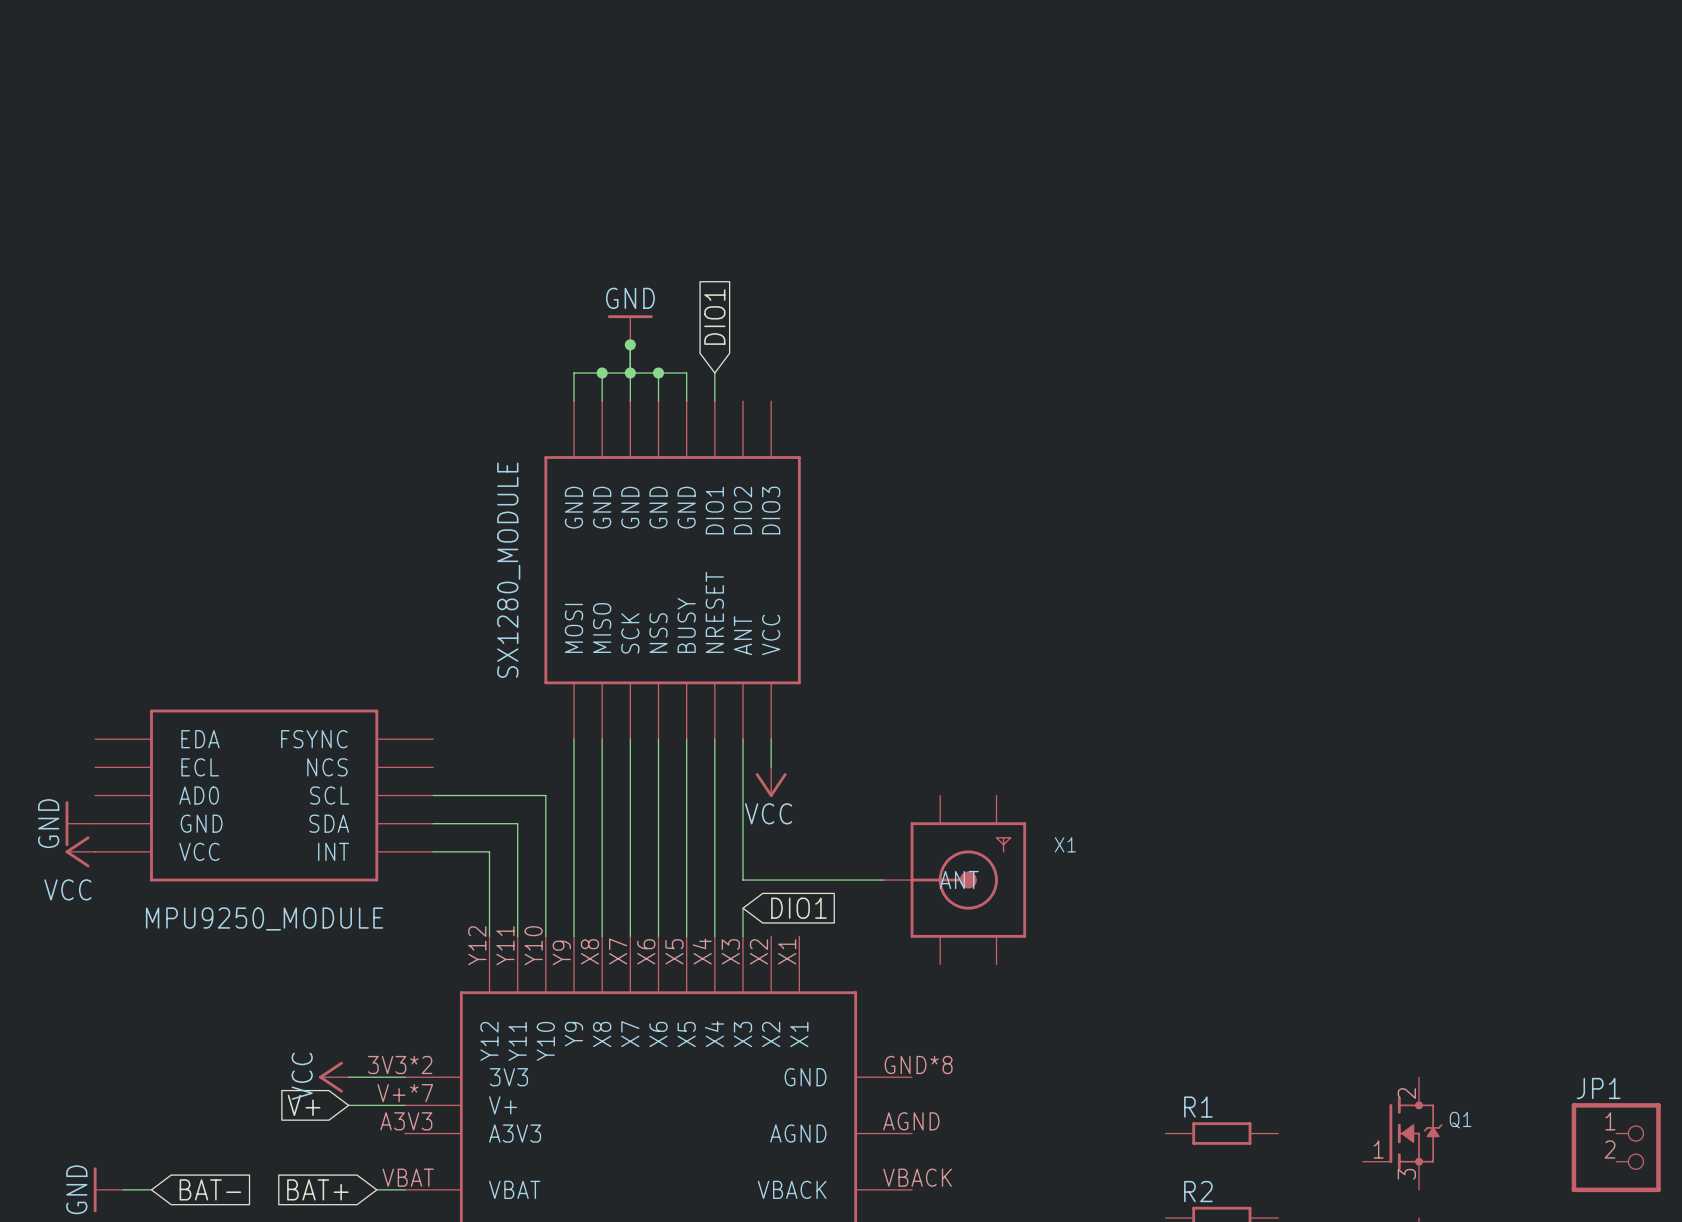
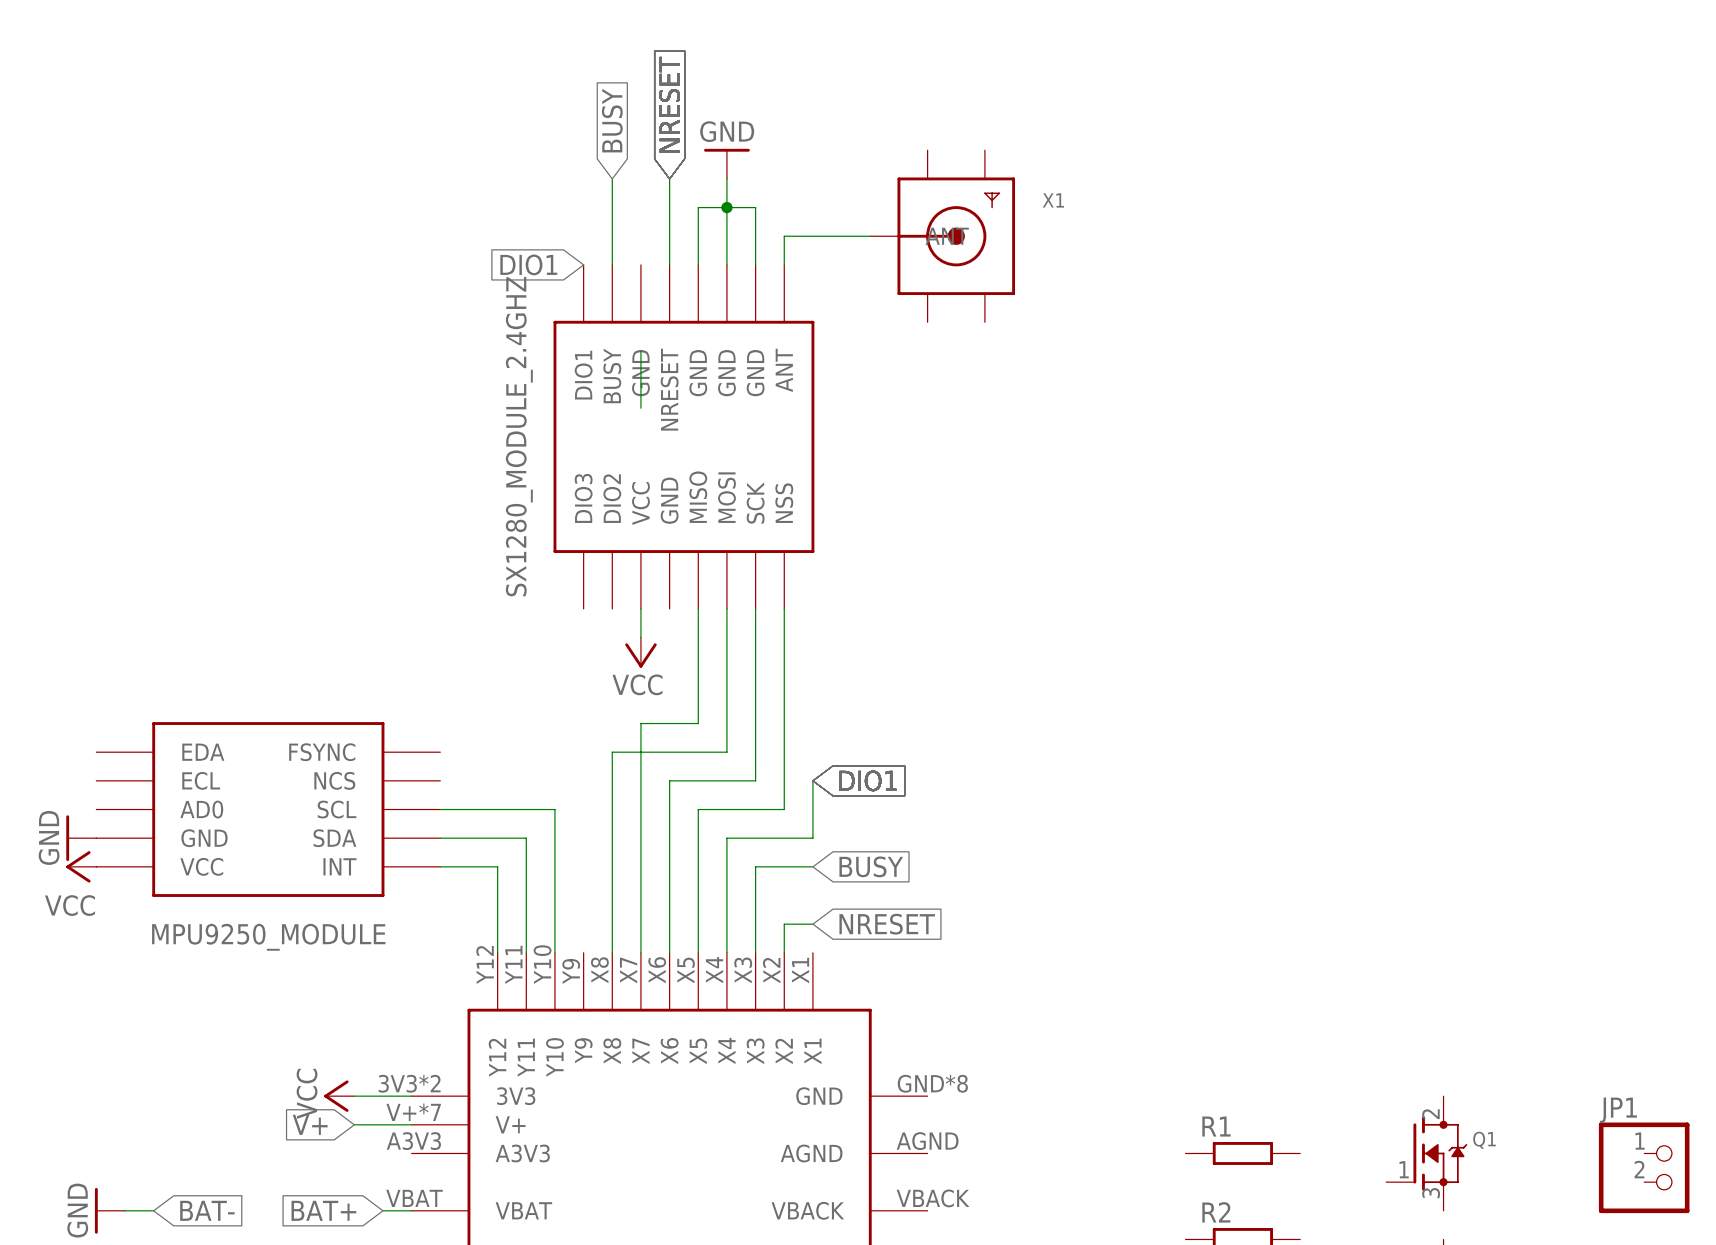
global label: none -> NRESET (669, 104)
global label: none -> BUSY (612, 120)
wire: none -> (612, 178) (612, 264)
wire: none -> (669, 178) (669, 264)
wire: none -> (726, 178) (726, 264)
junction: none -> (726, 207)
wire: none -> (870, 236) (784, 236) (784, 264)
wire: none -> (698, 264) (698, 207) (755, 207) (755, 264)
global label rotation: 0° (714, 317) -> 90° counterclockwise (528, 264)
global label position: DIO1 (714, 317) -> DIO1 (528, 264)
power symbol position: GND (630, 330) -> GND (726, 163)
junction: (630, 344) -> none
wire: (602, 373) (602, 401) -> (640, 608) (640, 637)
junction: (602, 373) -> none
junction: (630, 373) -> none
wire: (658, 373) (658, 401) -> none
junction: (658, 373) -> none
wire: (714, 373) (714, 401) -> none
wire: (573, 401) (573, 373) (686, 373) (686, 401) -> none
part: none -> (683, 436)
part: (672, 570) -> none
wire: none -> (698, 608) (698, 723) (640, 723) (640, 752)
wire: none -> (726, 608) (726, 752) (612, 752)
wire: none -> (755, 608) (755, 752)
wire: none -> (784, 608) (784, 752)
wire: (573, 739) (573, 936) -> none
wire: (658, 739) (658, 767) -> (755, 780) (669, 780)
wire: (686, 739) (686, 795) -> (784, 780) (784, 809) (698, 809)
wire: (714, 739) (714, 823) -> (812, 780) (812, 838) (726, 838)
wire: (743, 767) (743, 851) -> (812, 866) (755, 866)
power symbol position: VCC (771, 782) -> VCC (640, 652)
global label: none -> BUSY (871, 866)
wire: (743, 880) (883, 880) -> (755, 895) (755, 924)
X1 position: (954, 880) -> (942, 236)
global label position: DIO1 (798, 908) -> DIO1 (867, 780)
wire: none -> (812, 924) (784, 924) (784, 952)
global label: none -> NRESET (887, 924)

